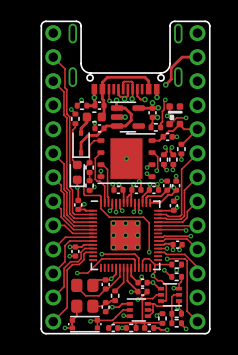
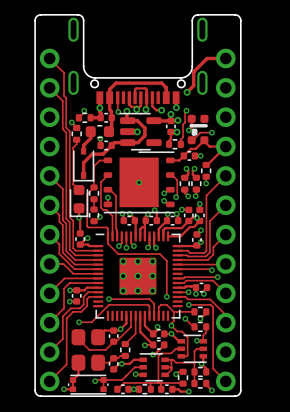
part: (53, 33) -> none
part: (197, 33) -> none

